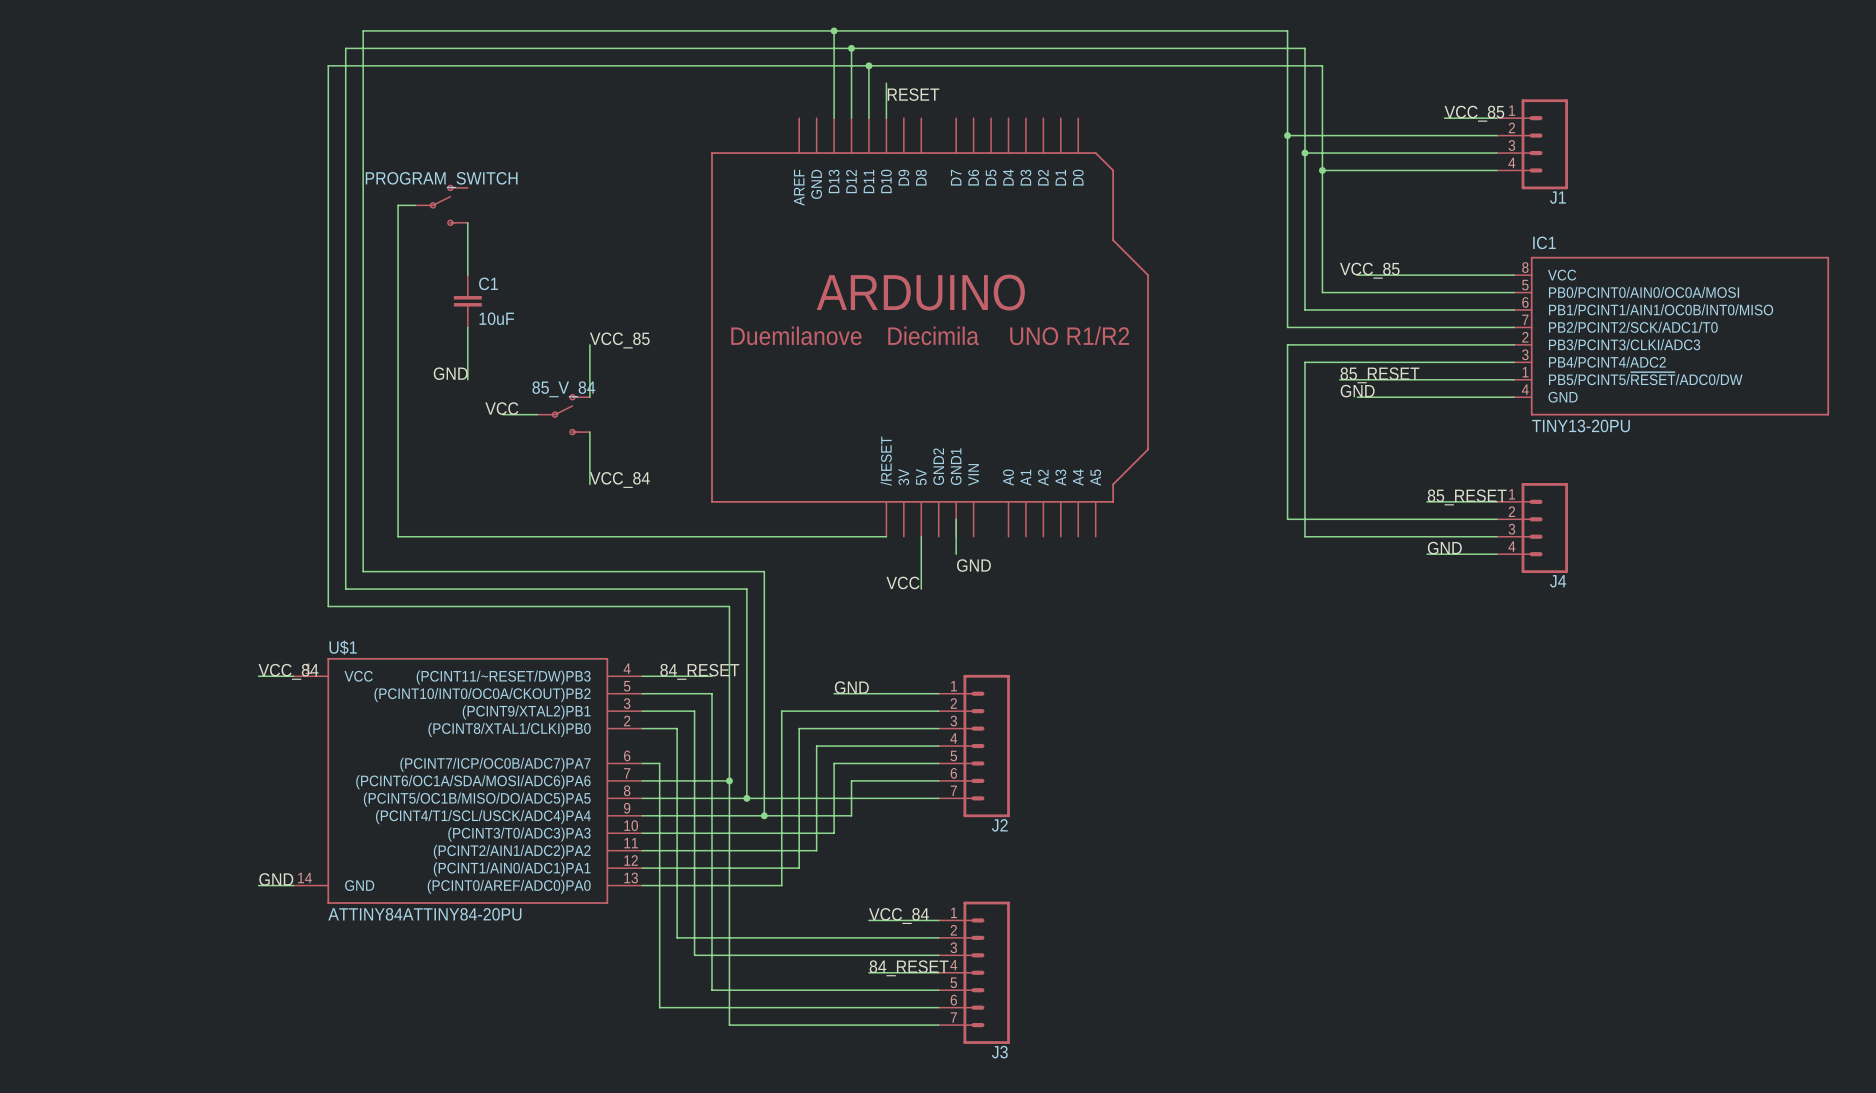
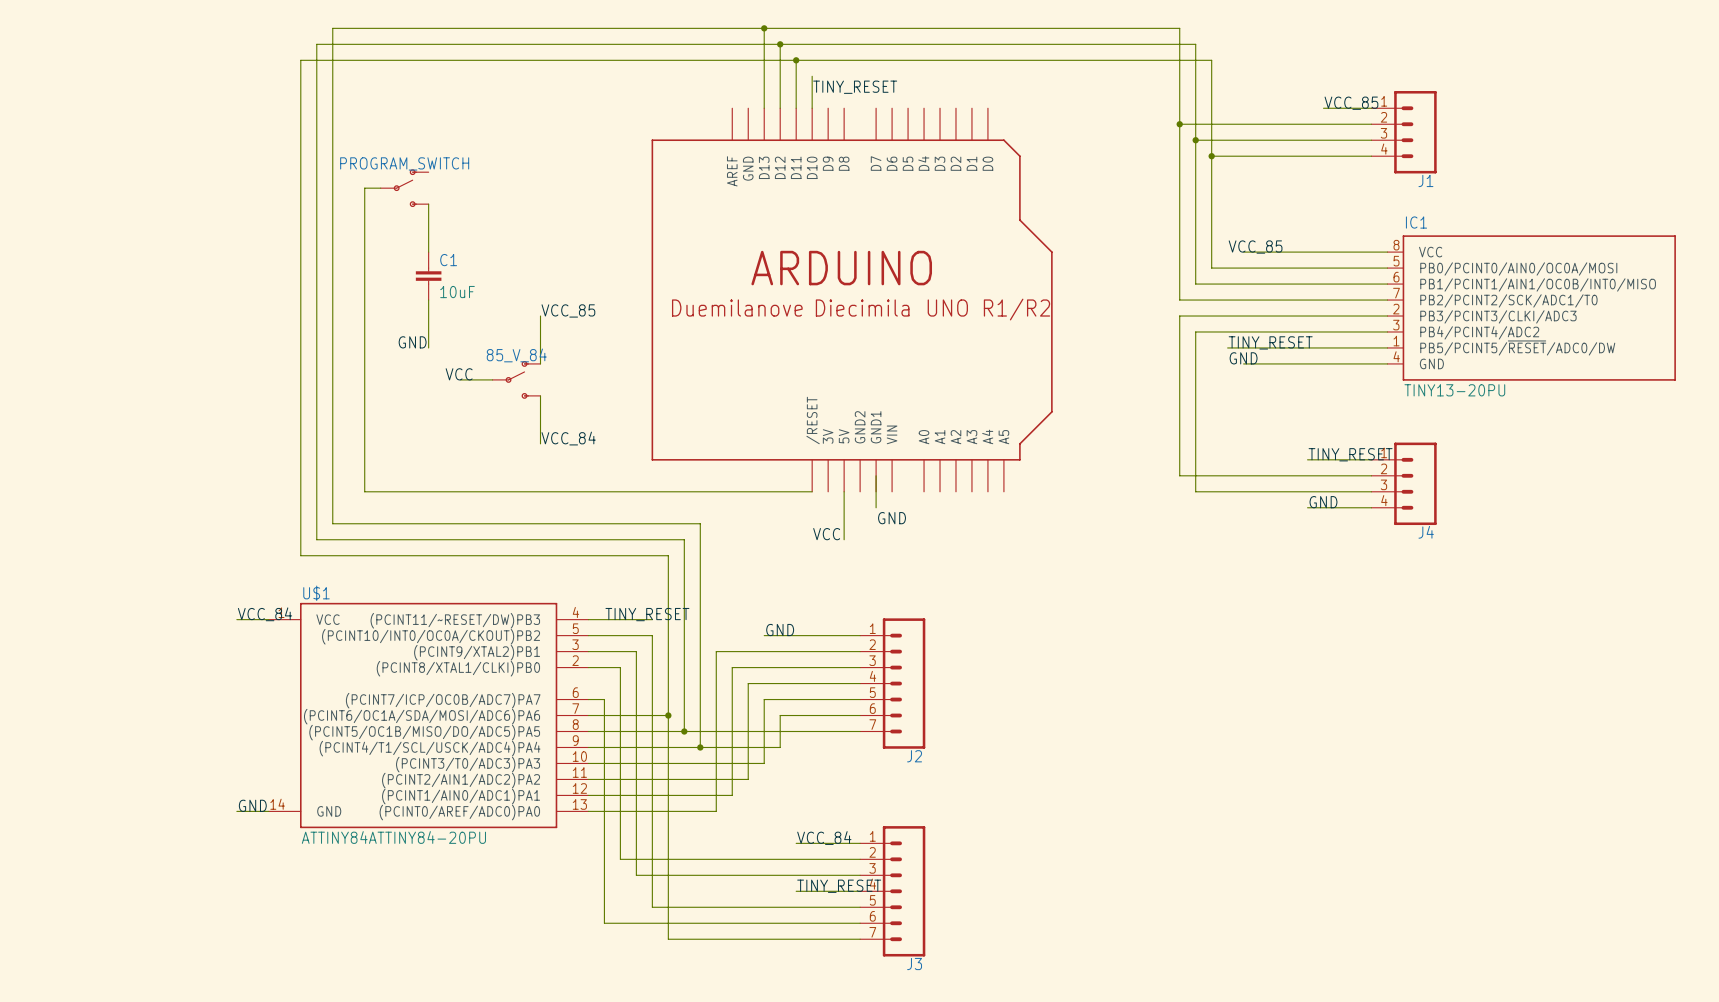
label: RESET (913, 94) -> TINY_RESET (855, 87)
label: 85_RESET (1379, 375) -> TINY_RESET (1270, 342)
label: 85_RESET (1467, 497) -> TINY_RESET (1350, 454)
label: 84_RESET (699, 671) -> TINY_RESET (647, 614)
label: 84_RESET (909, 968) -> TINY_RESET (839, 886)

